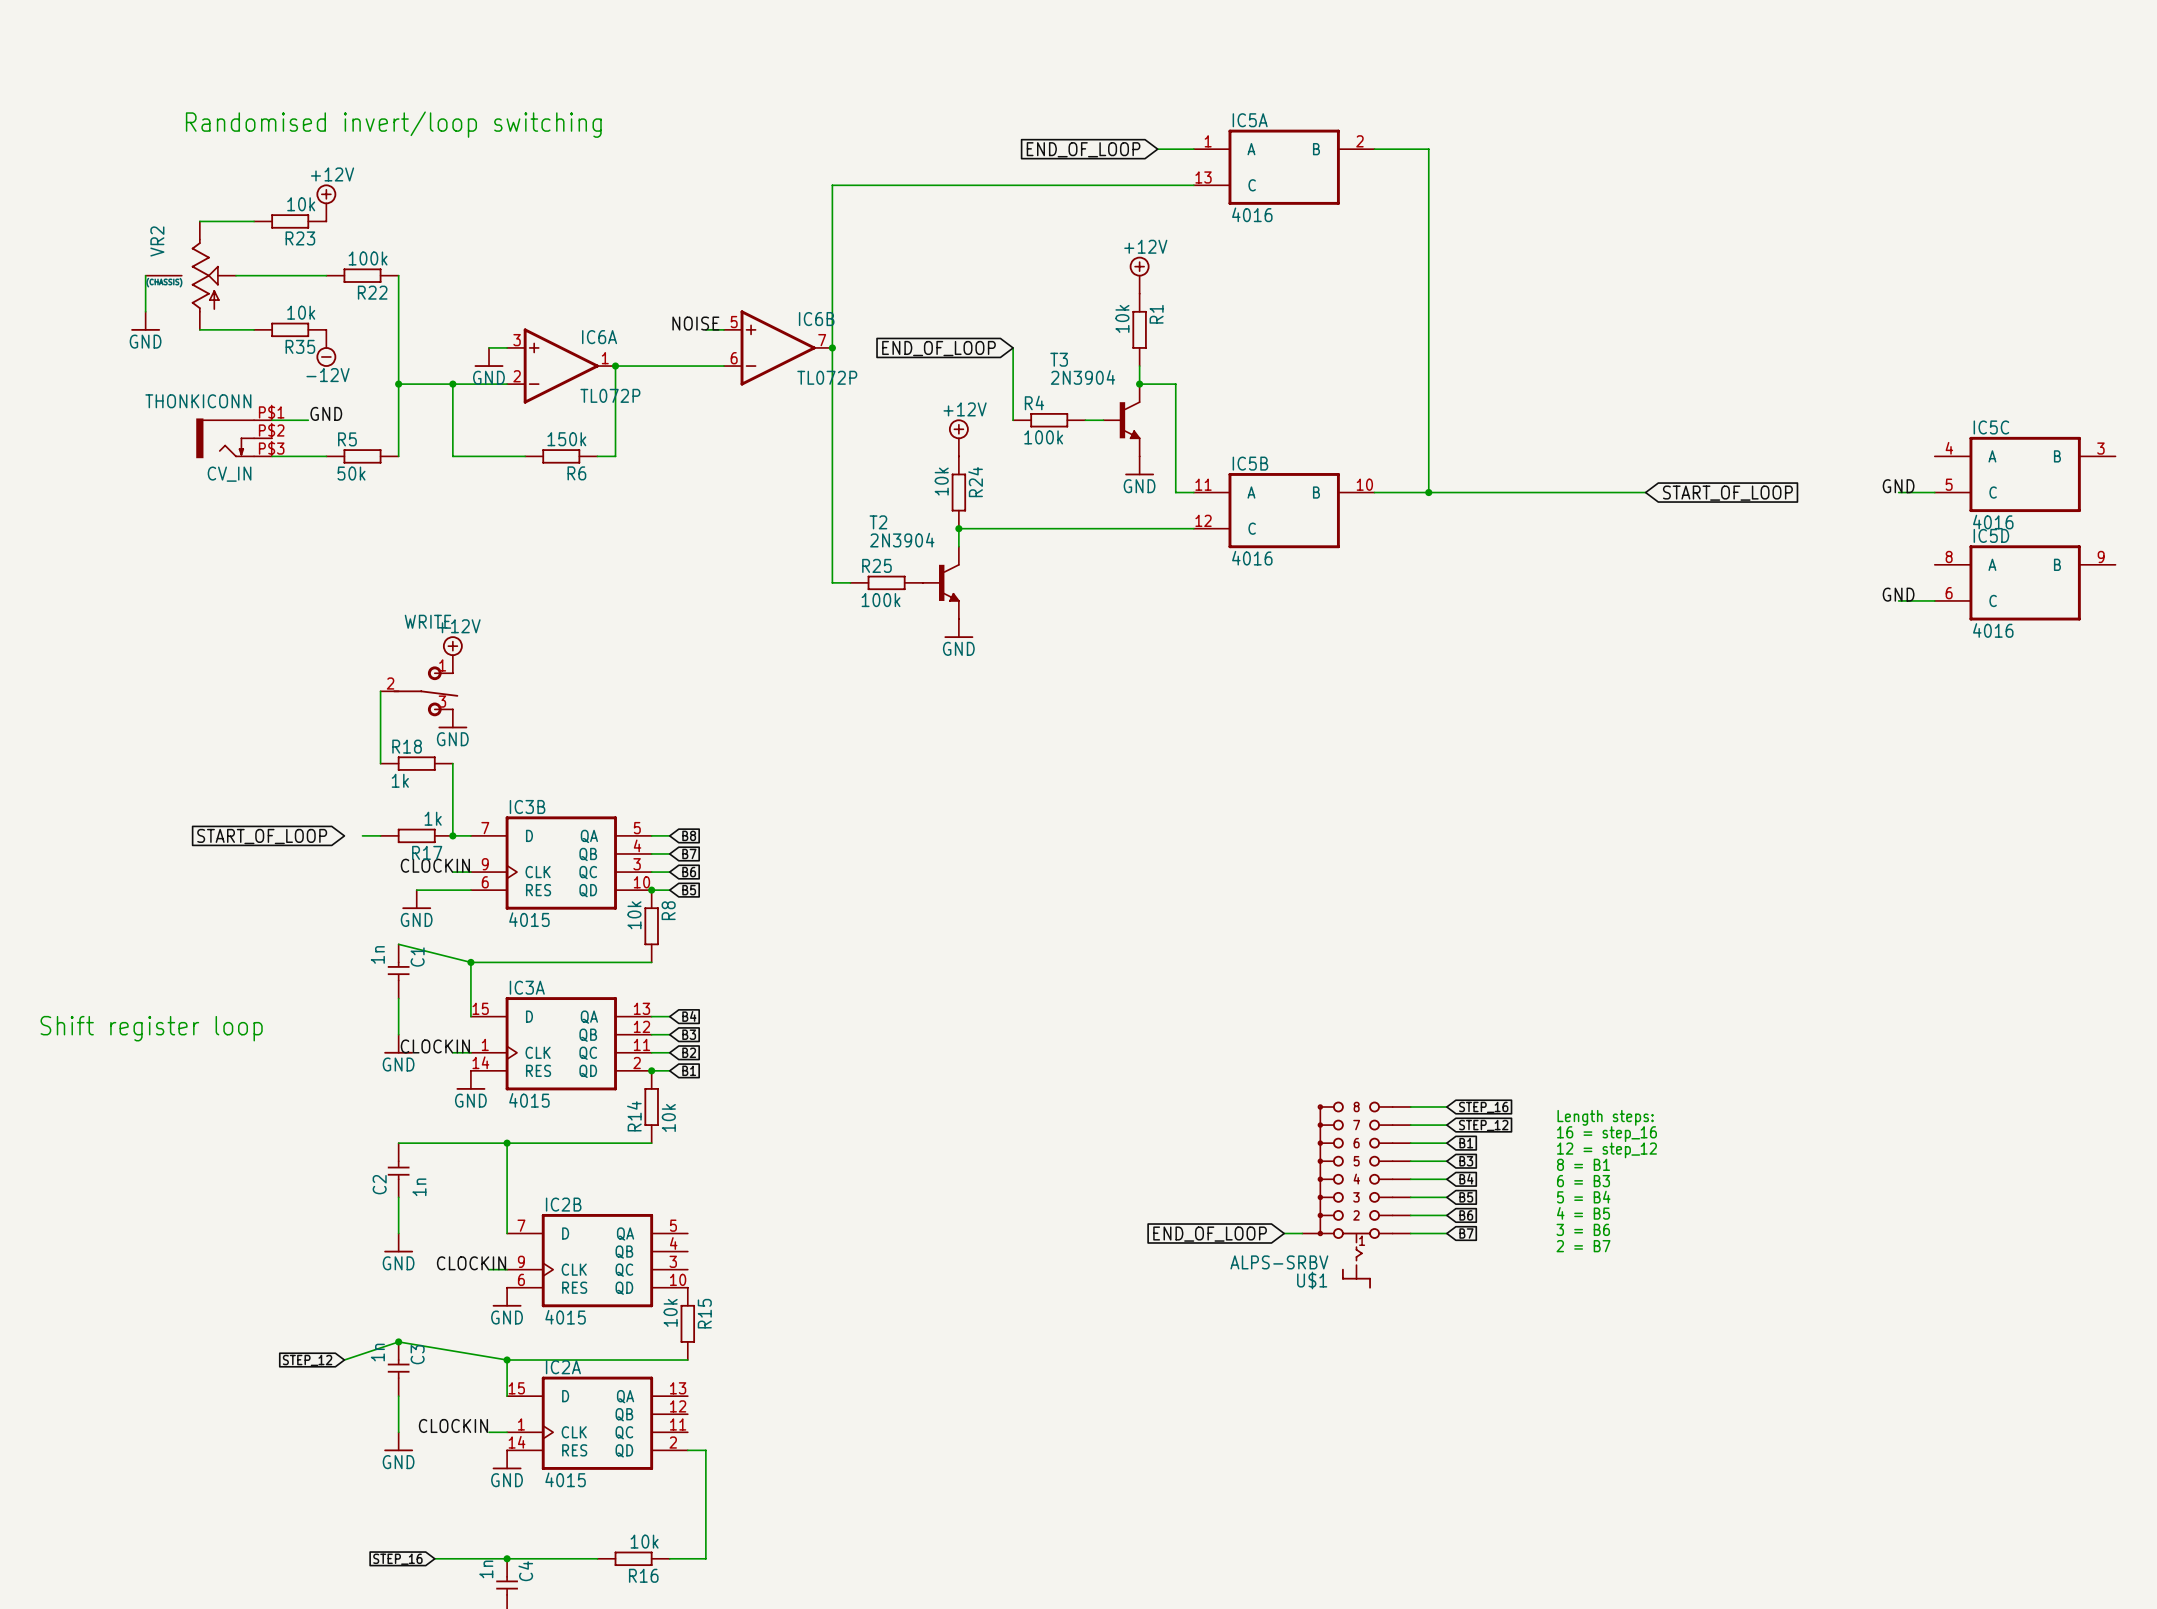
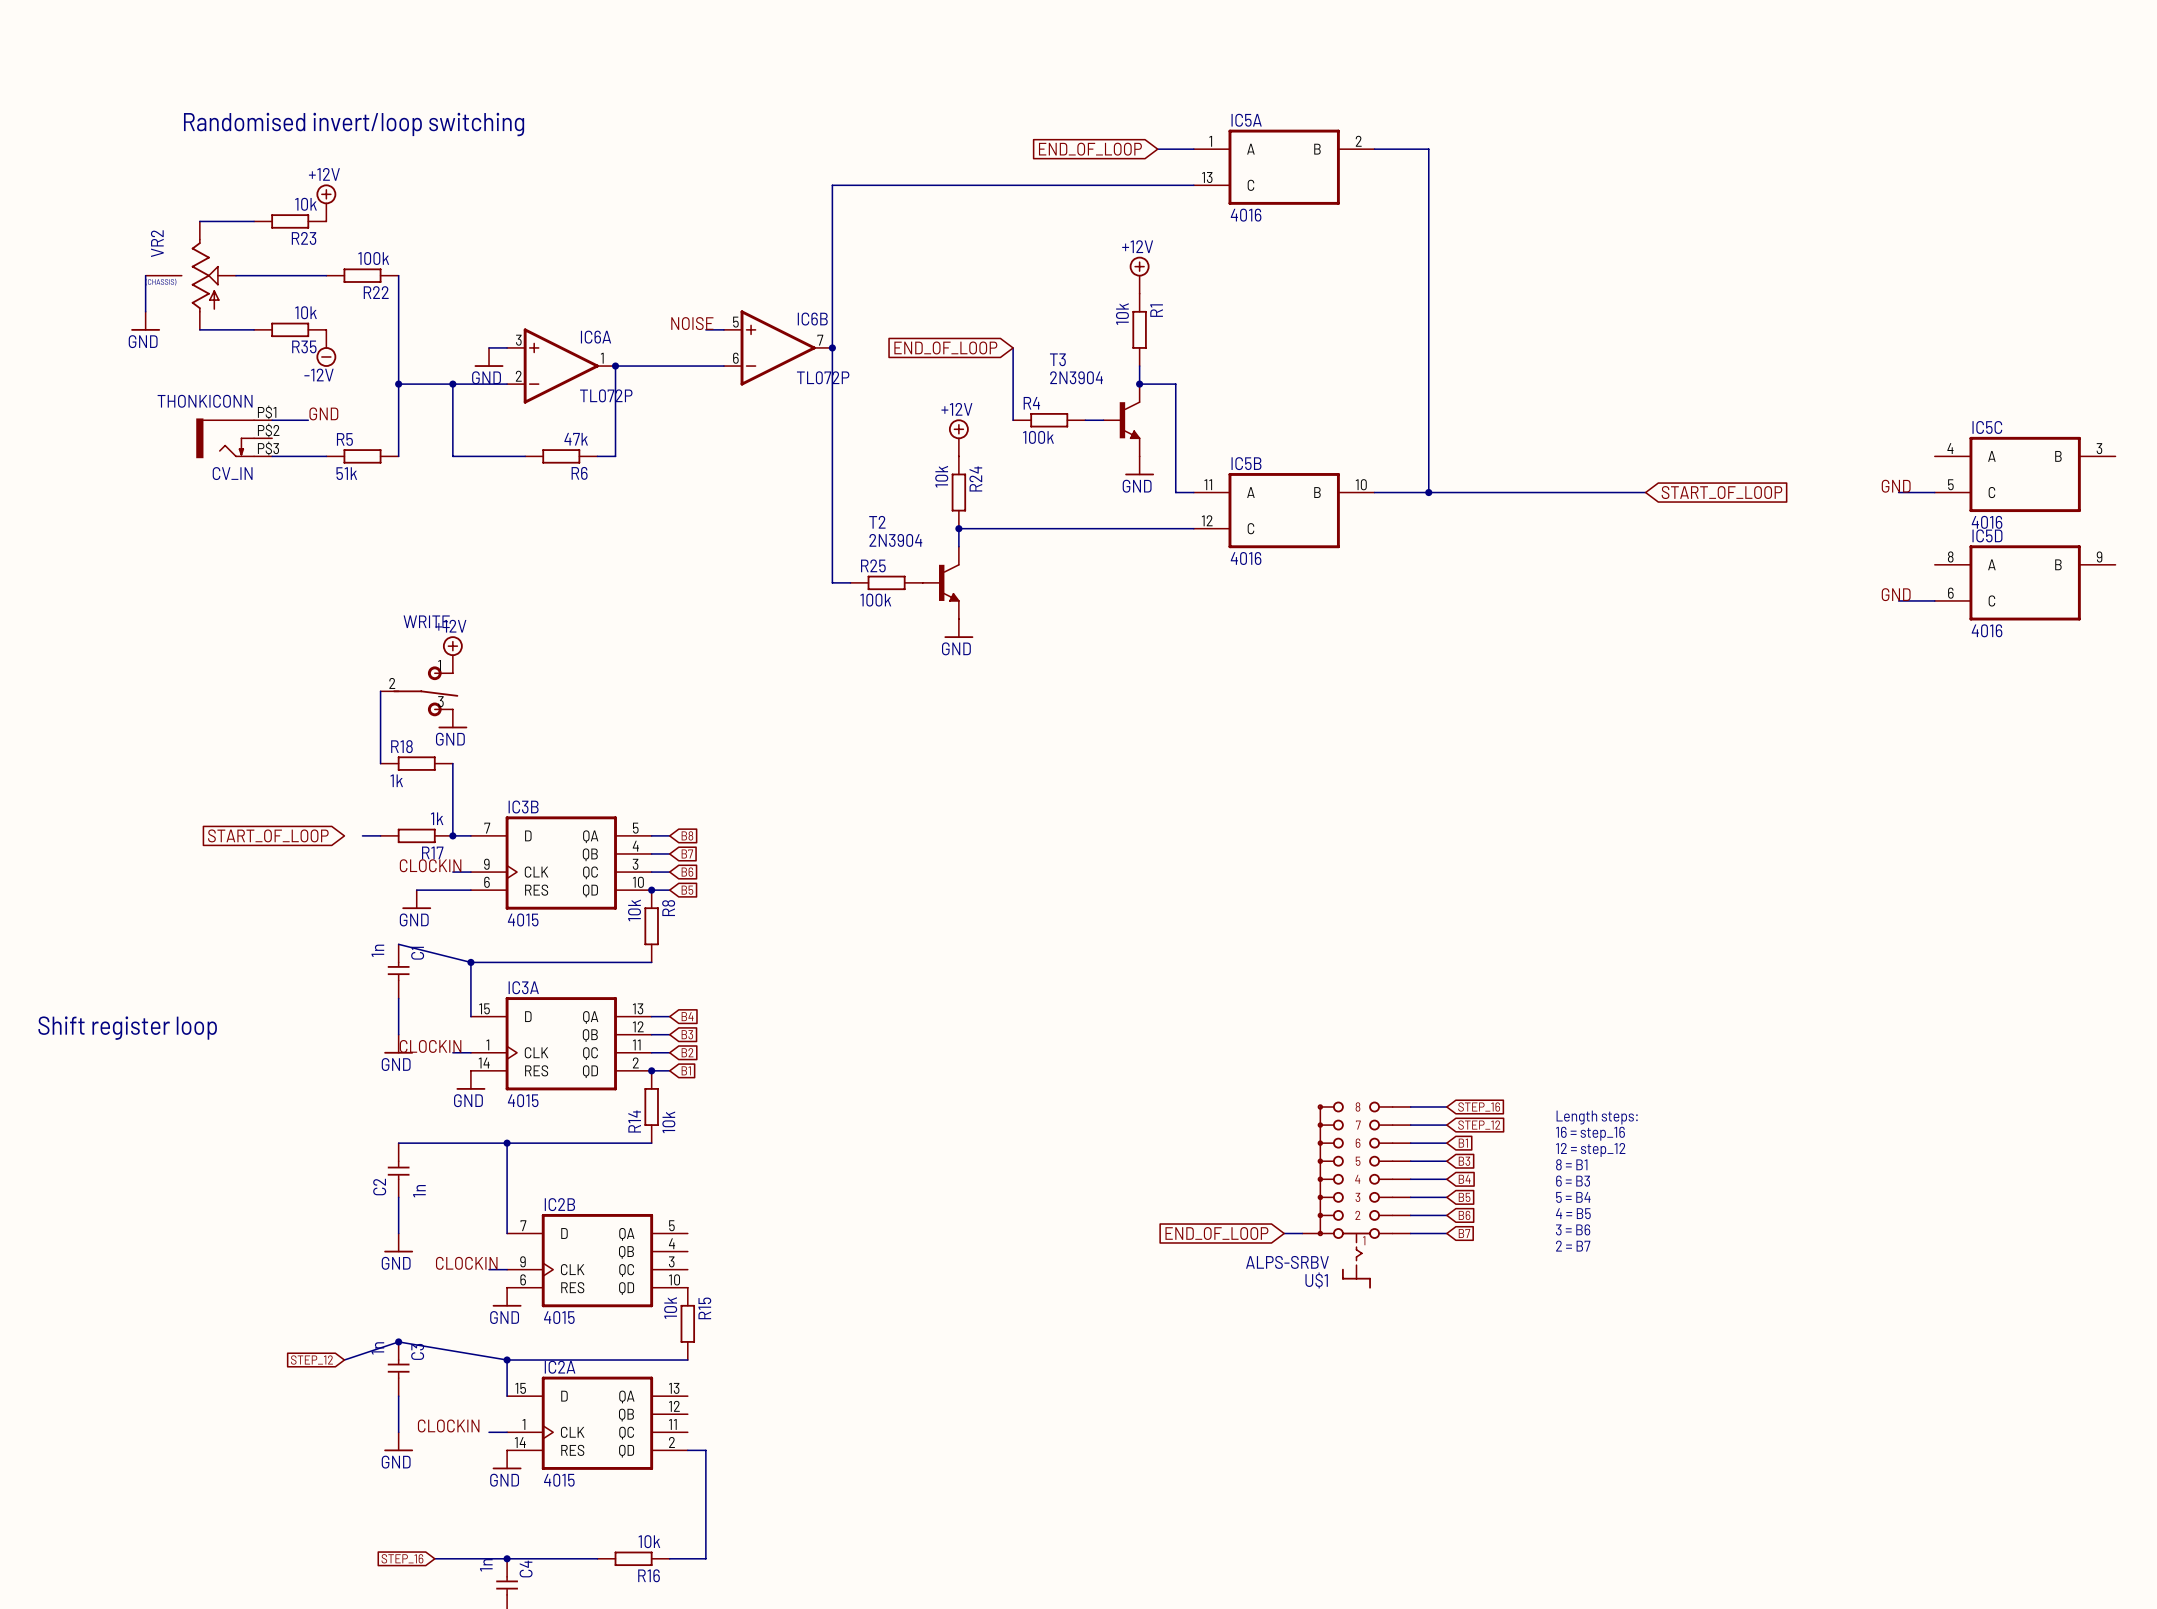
R6 value: 150k (566, 439) -> 47k (576, 439)
R5 value: 50k (351, 473) -> 51k (346, 473)

